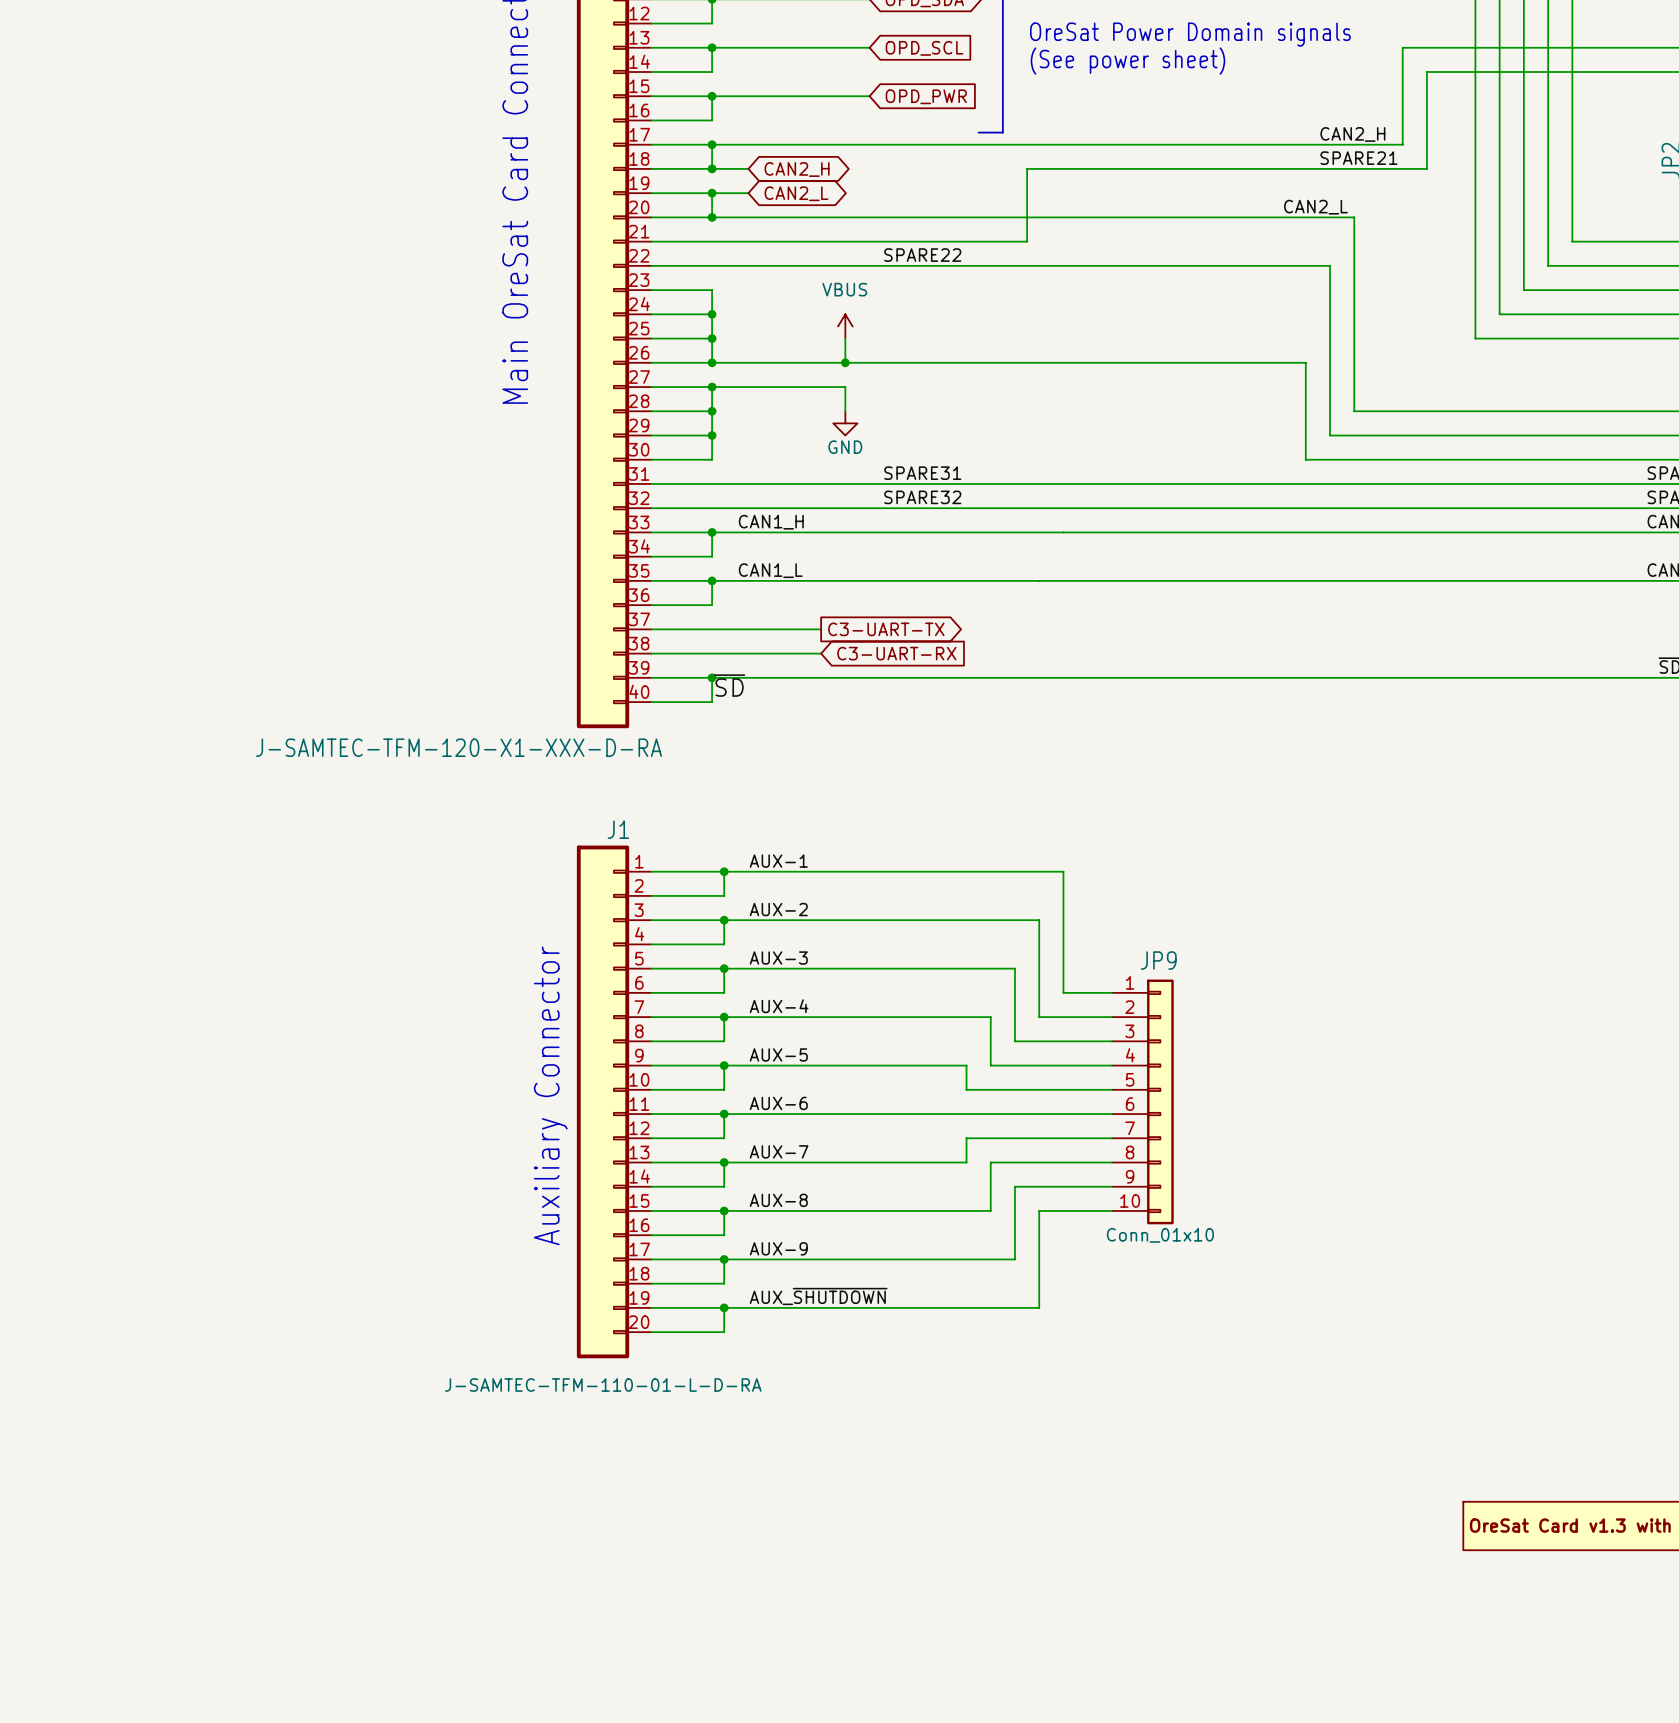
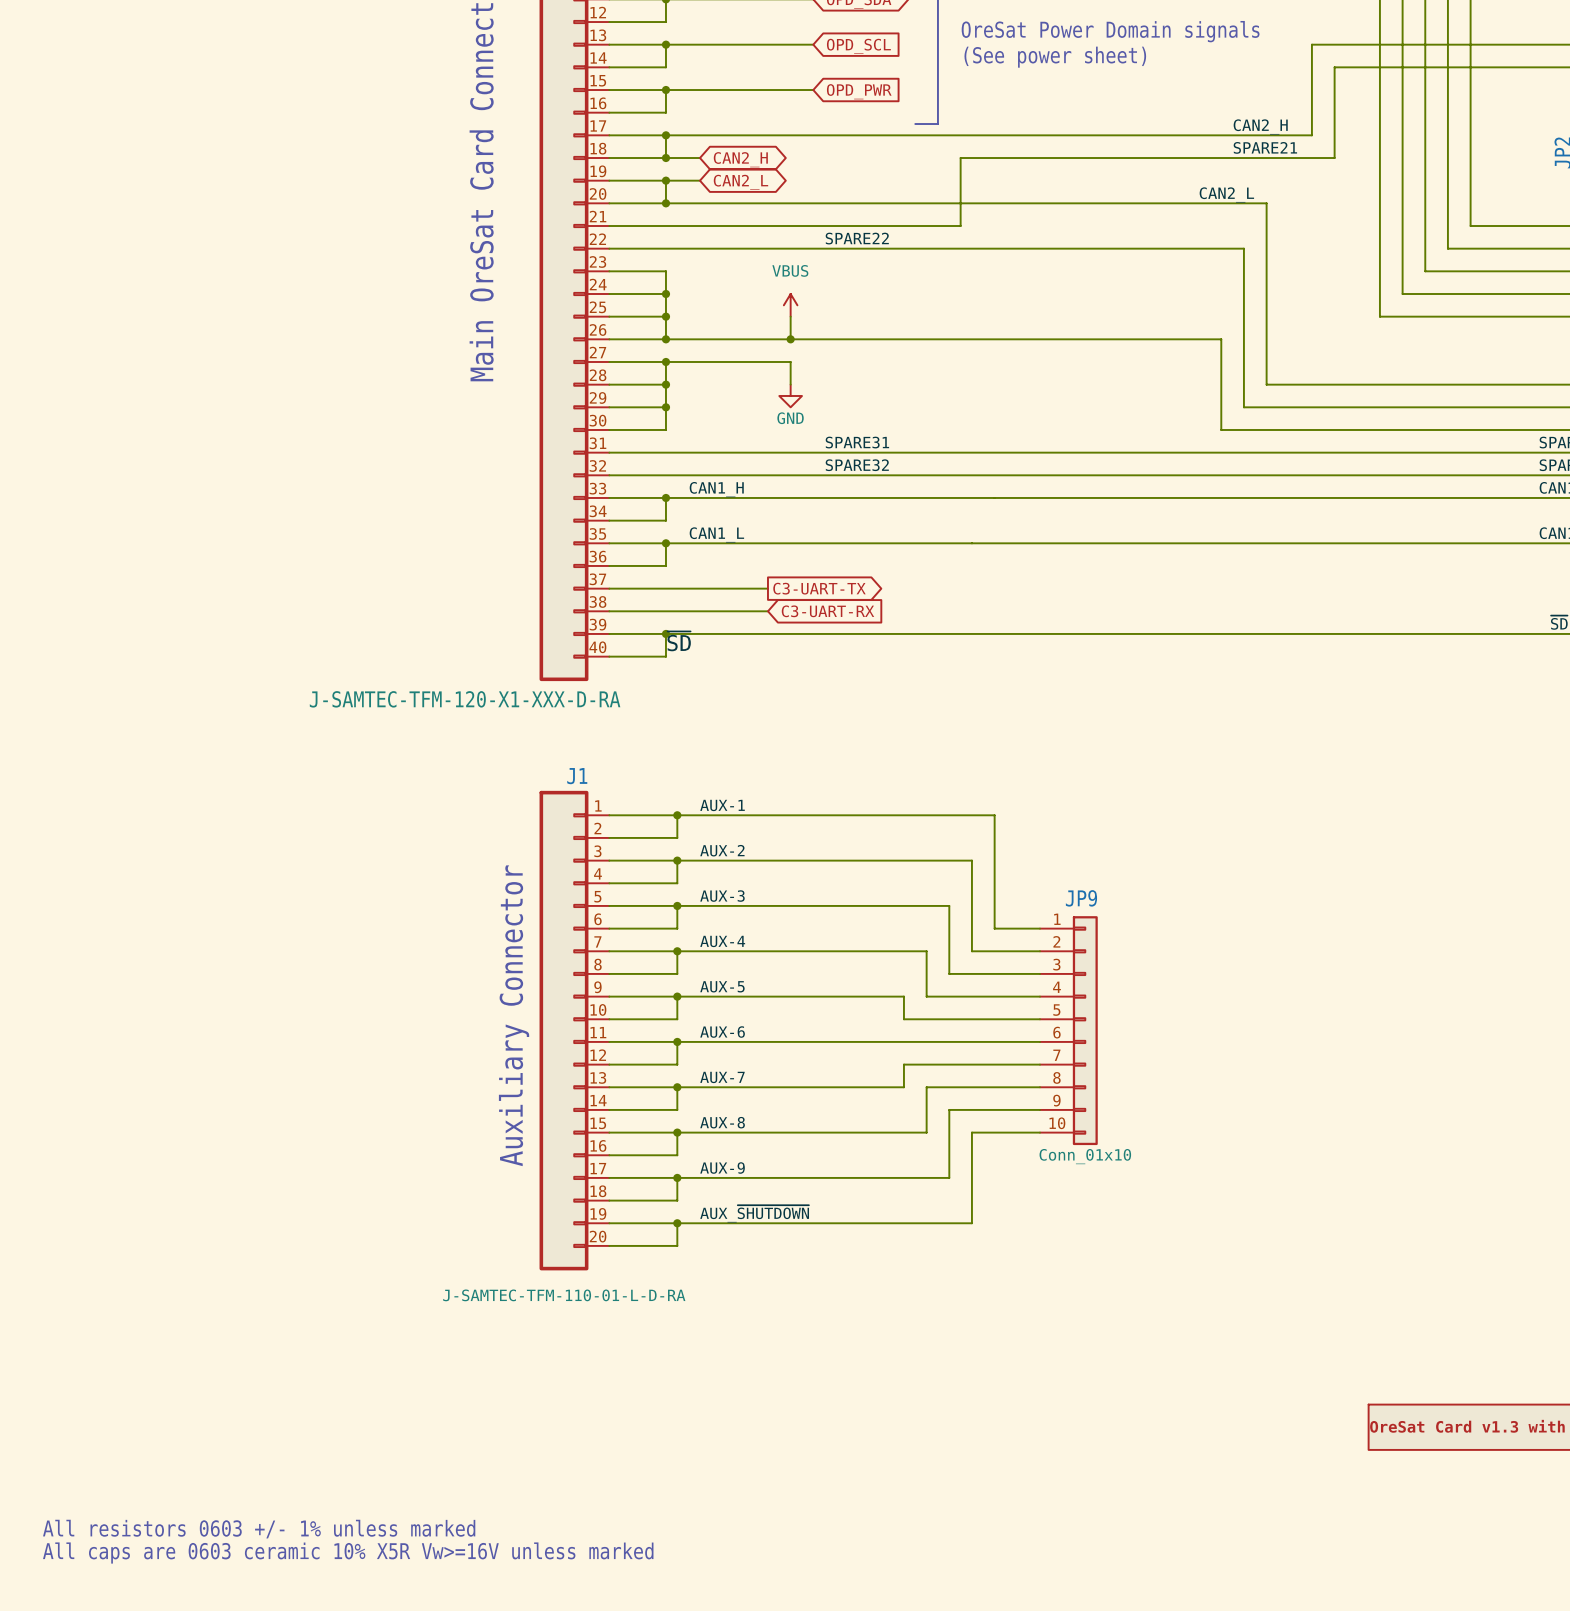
text: none -> All resistors 0603 +/- 1% unless marked (259, 1529)
text: none -> All caps are 0603 ceramic 10% X5R Vw>=16V unless marked (348, 1553)

